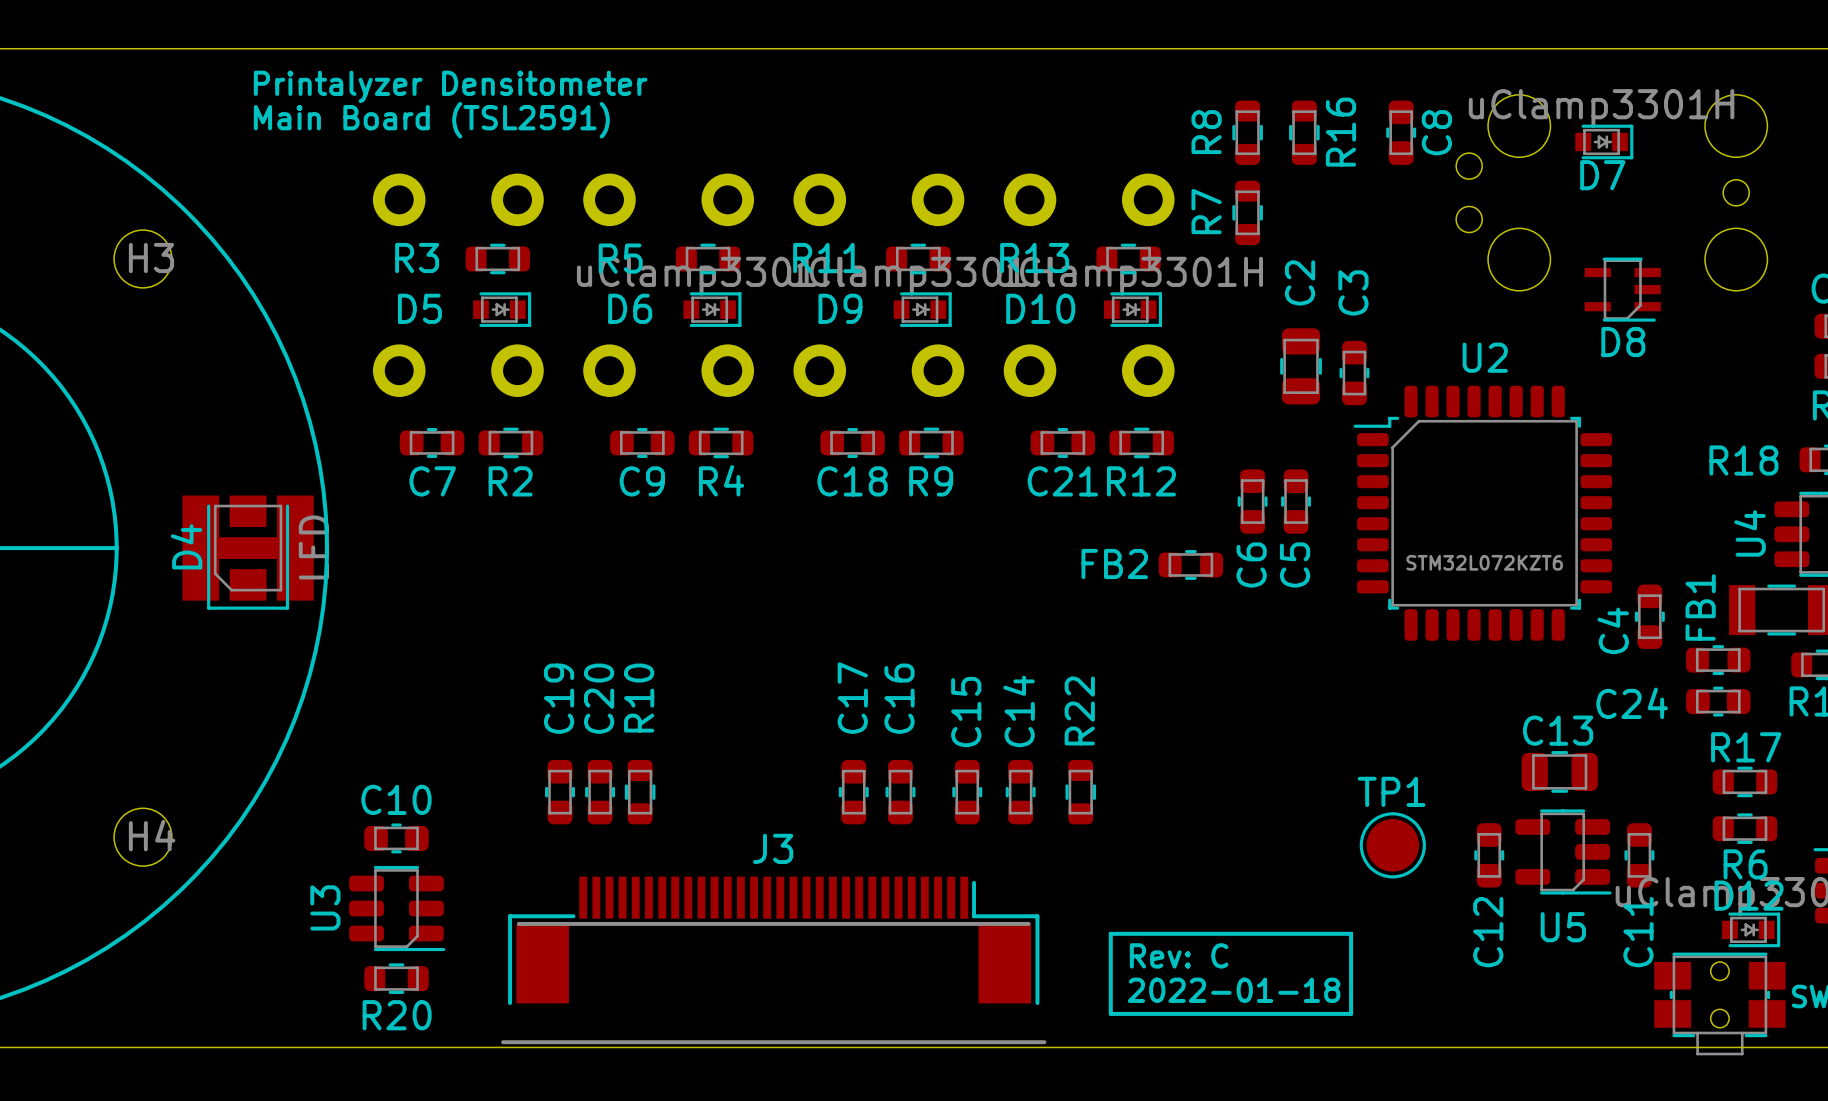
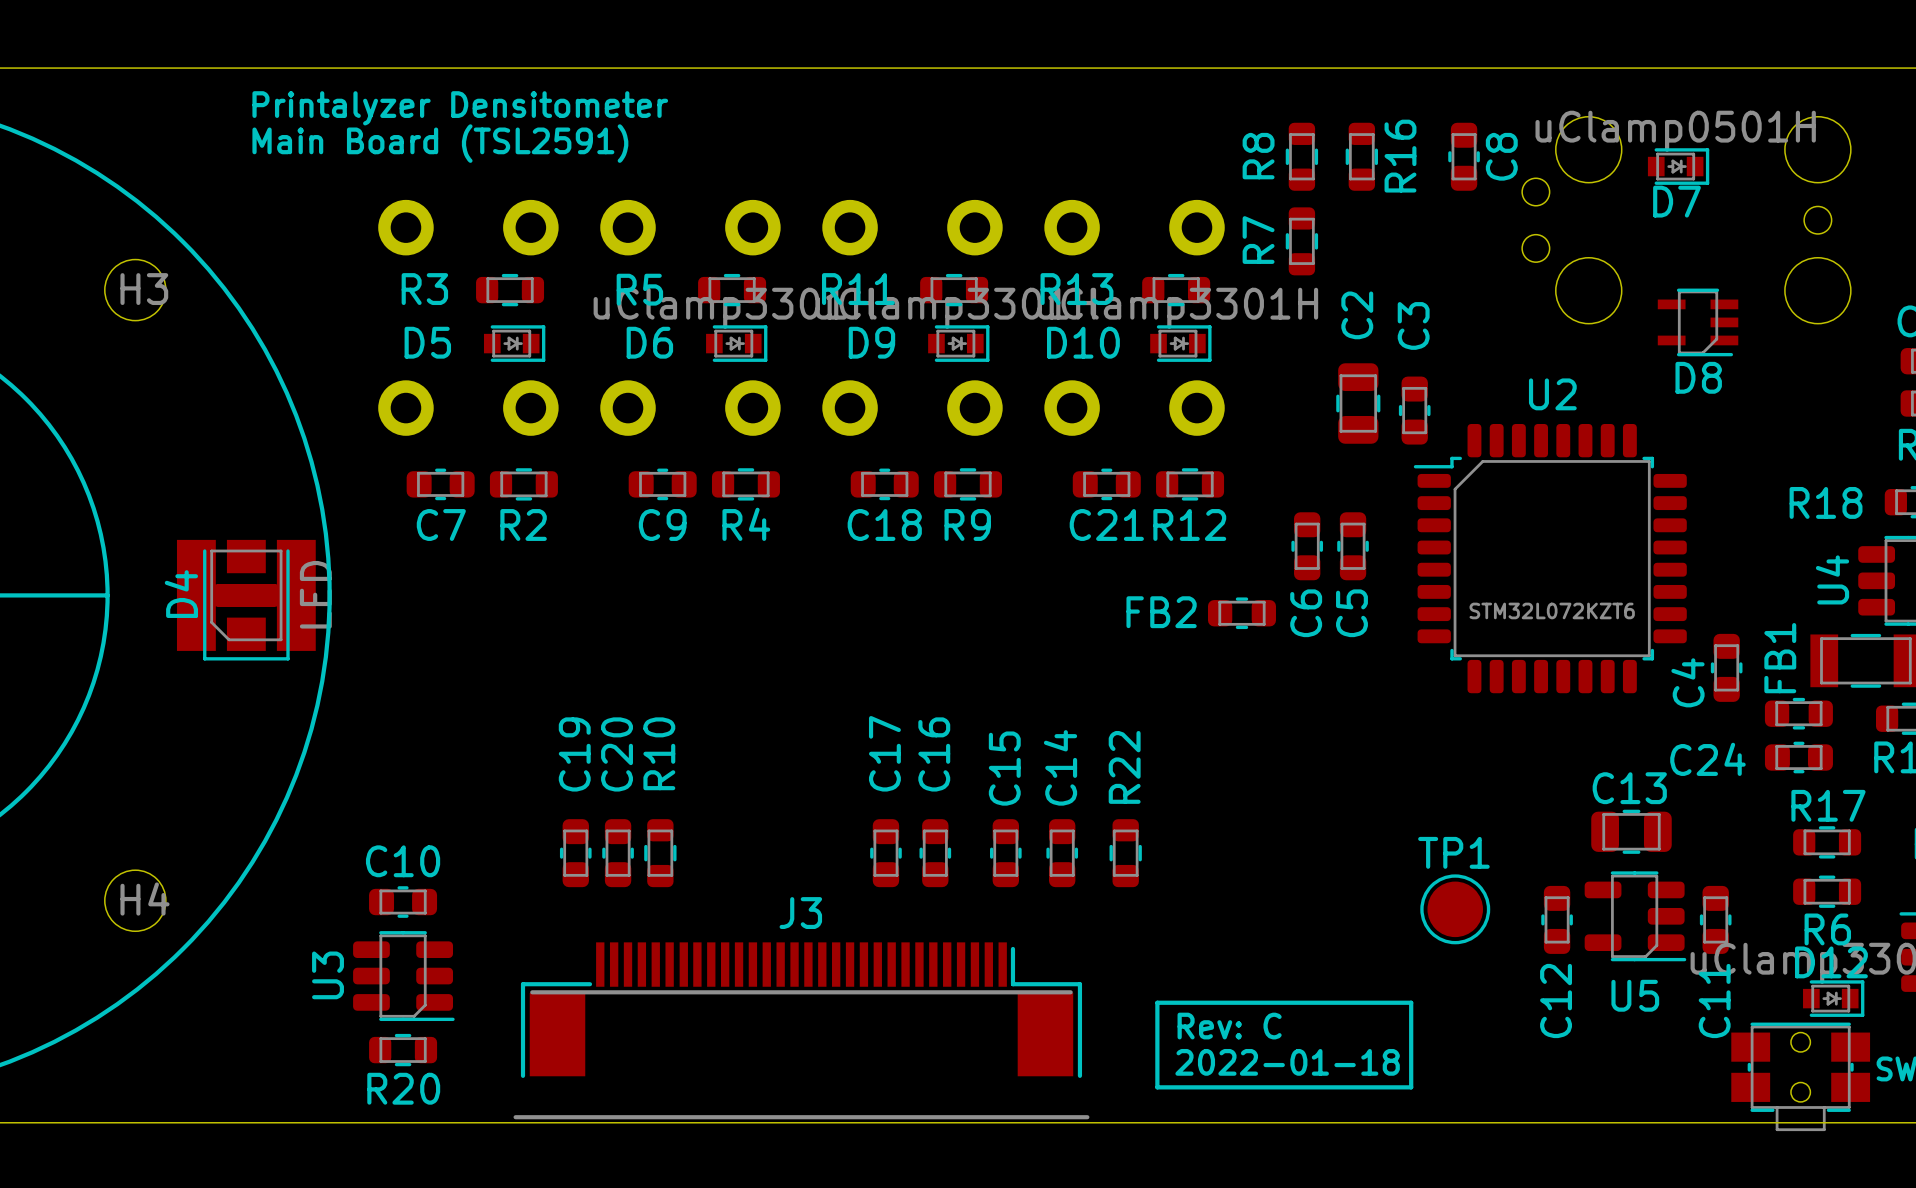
D7 value: uClamp3301H (1601, 108) -> uClamp0501H (1675, 131)

